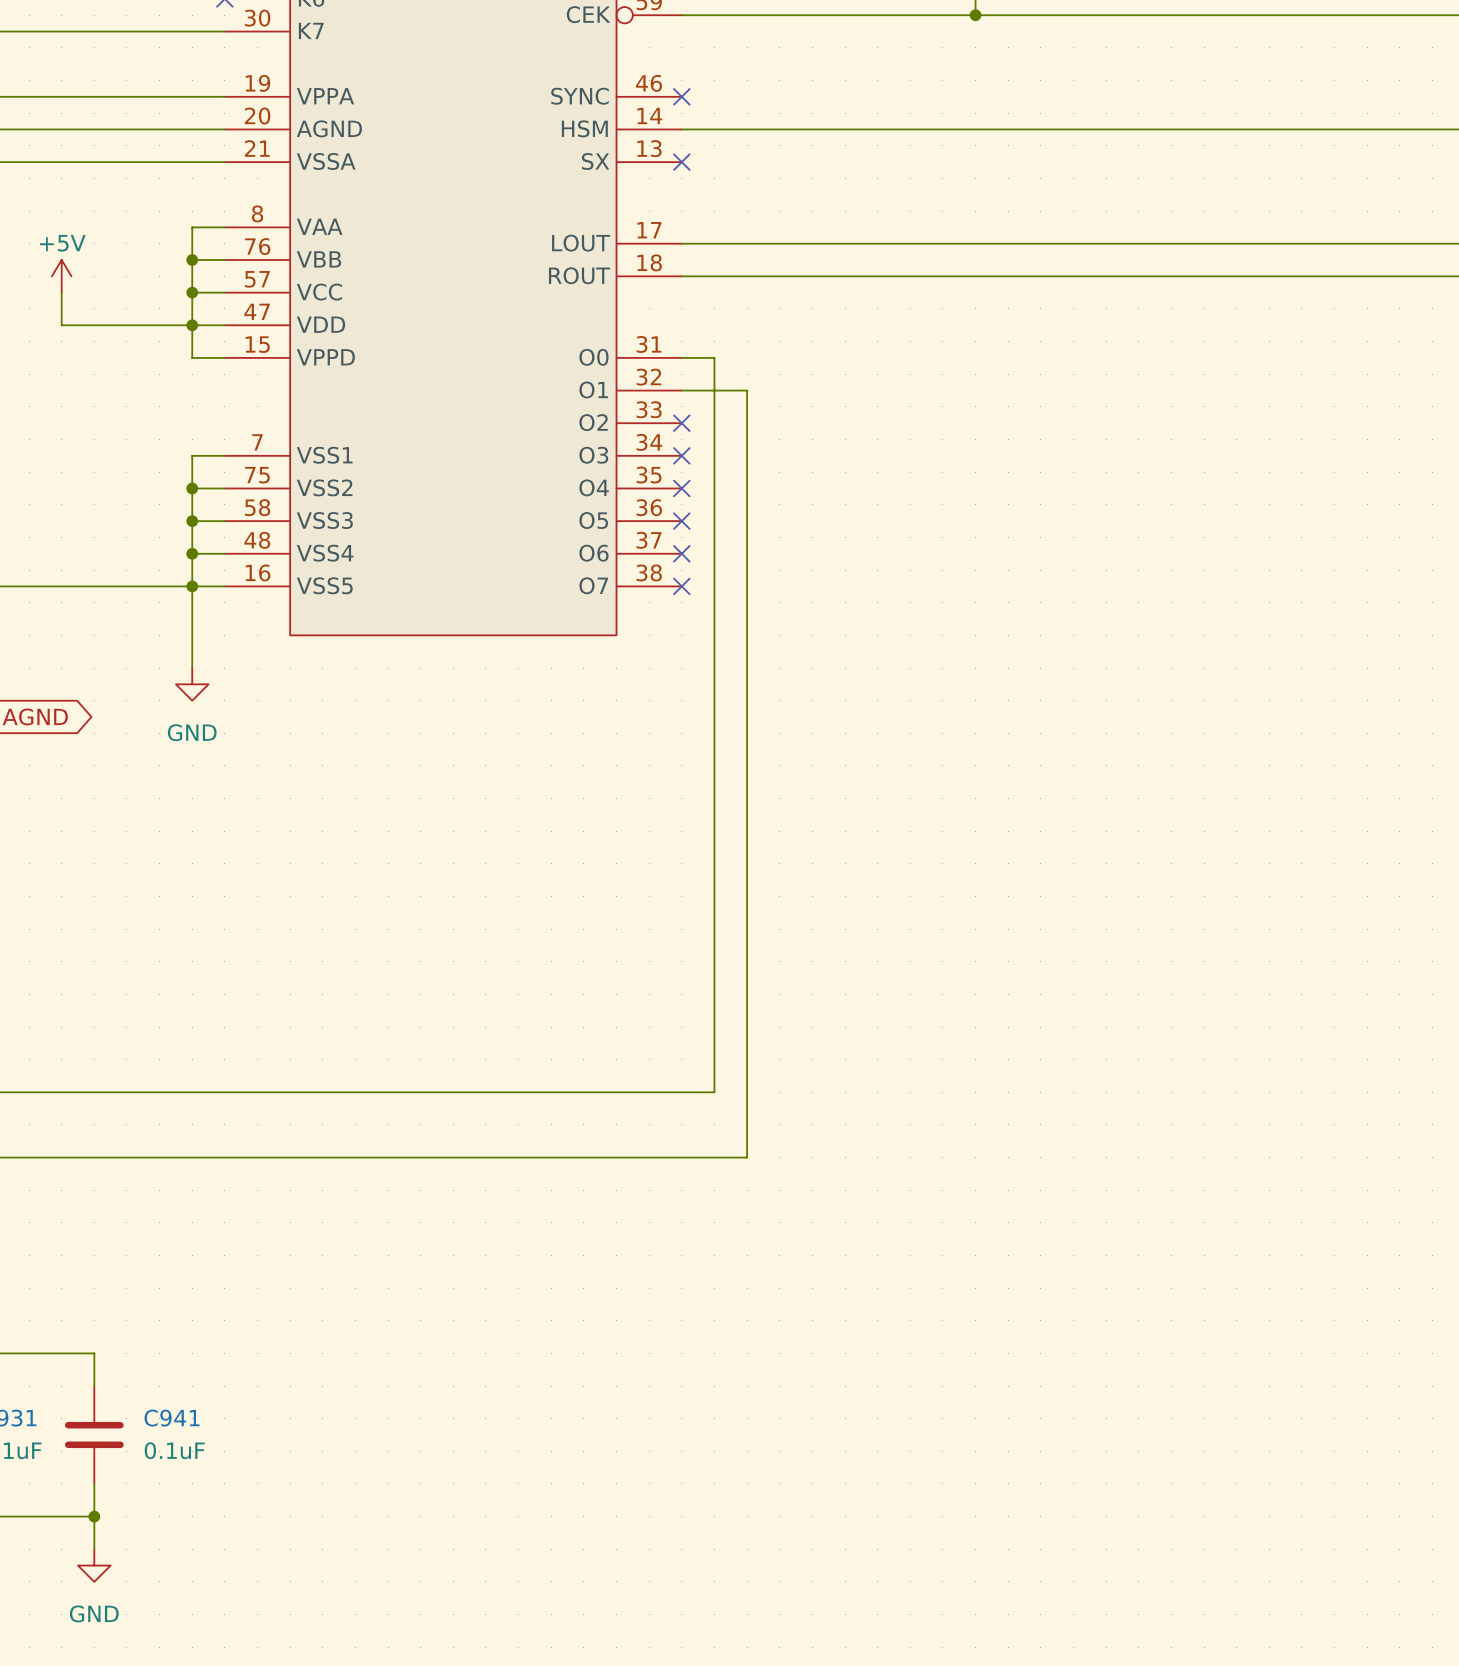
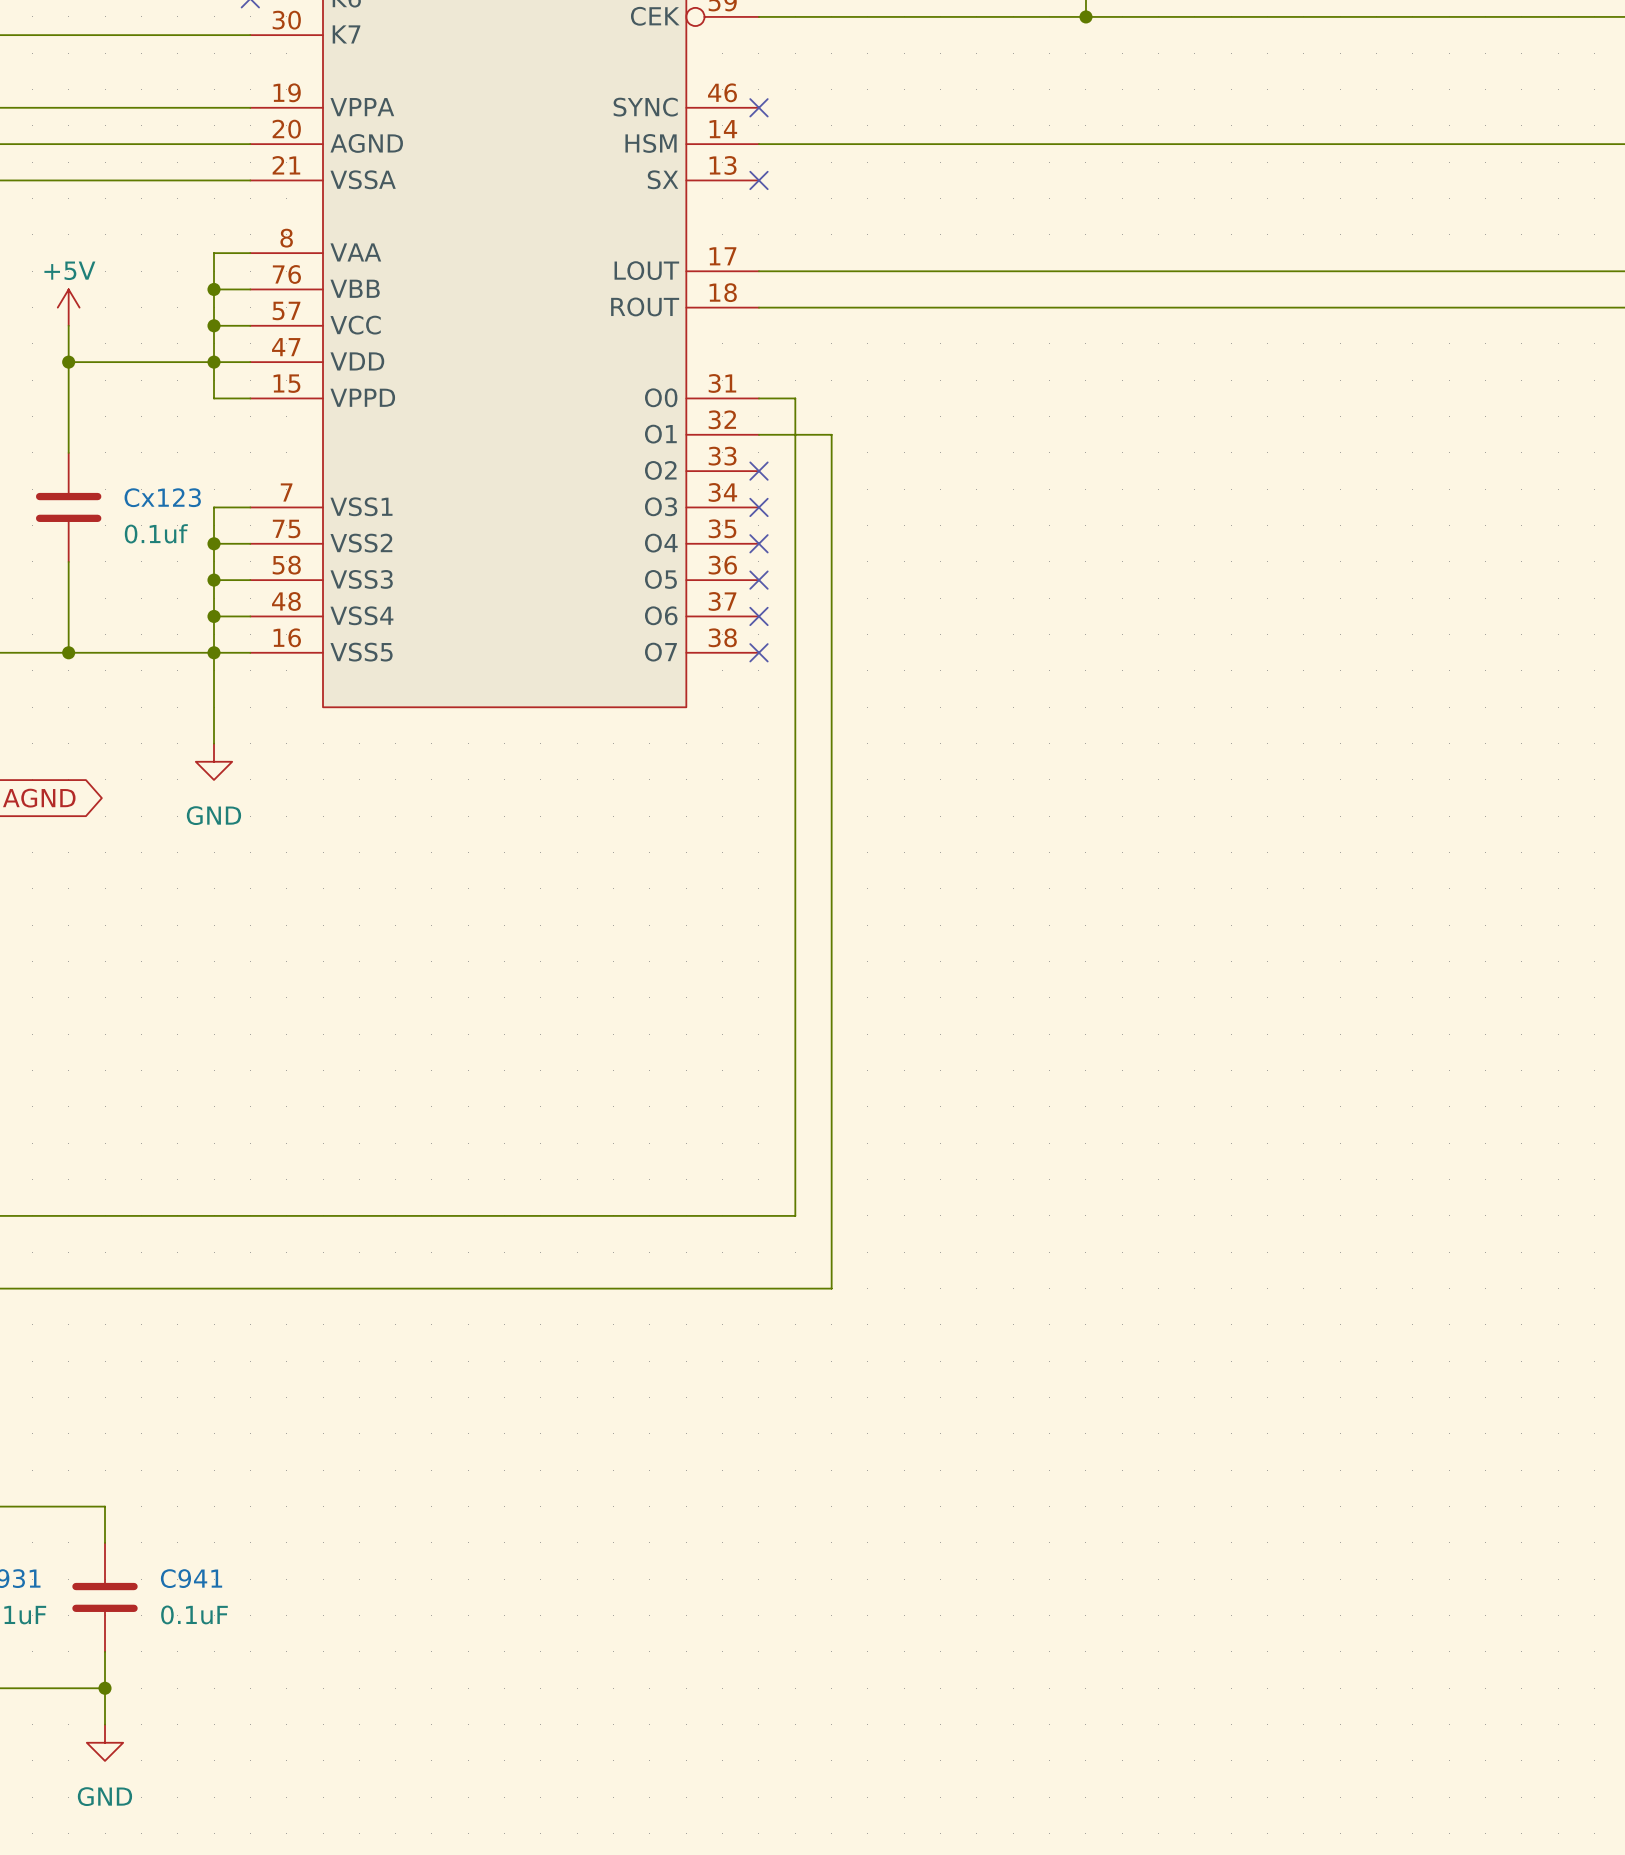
wire: none -> (68, 362) (68, 452)
junction: none -> (68, 362)
Cx123: none -> 0.1uf (68, 507)
wire: none -> (68, 561) (68, 652)
junction: none -> (68, 652)

